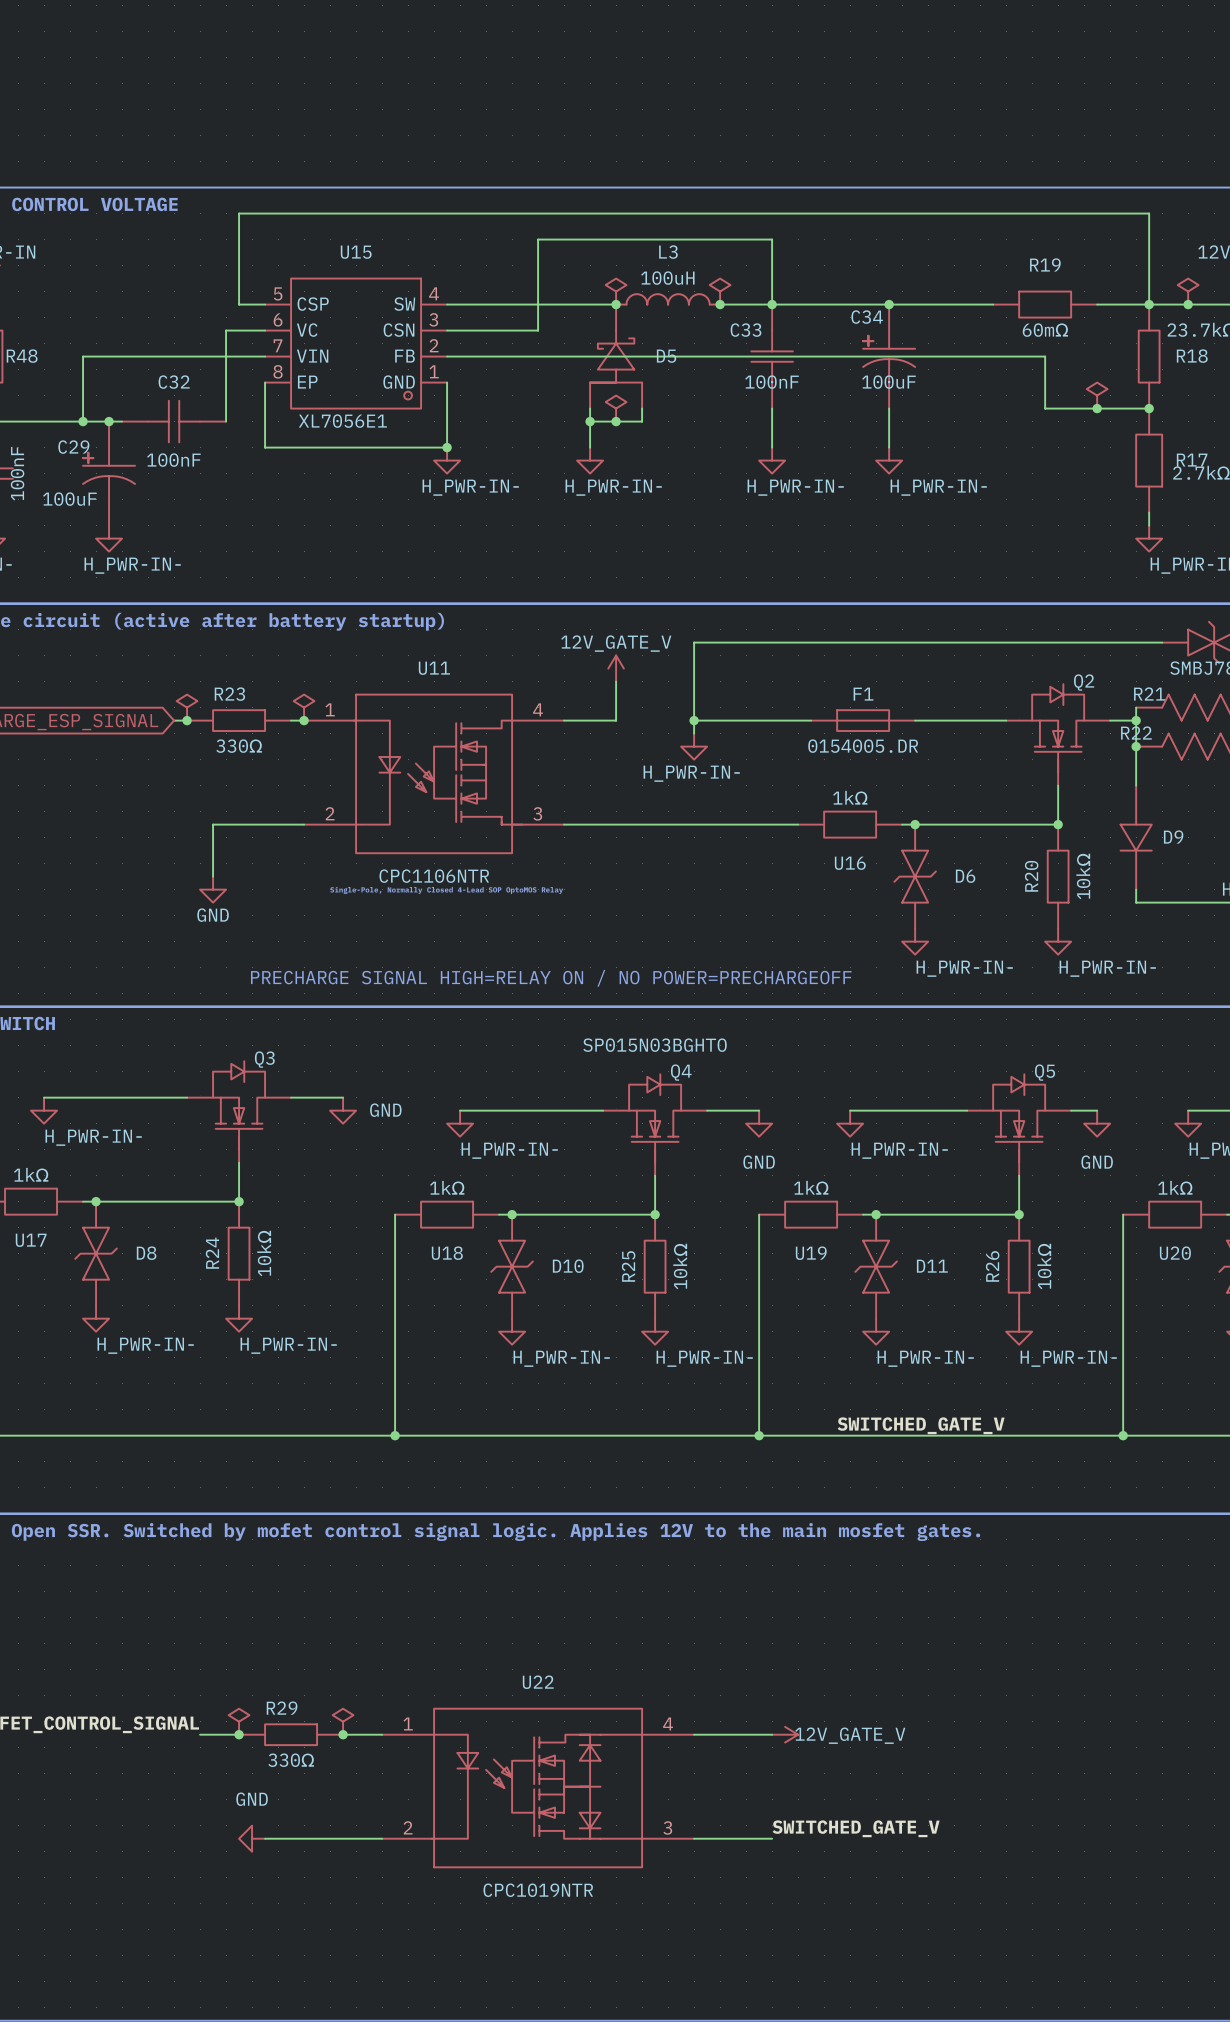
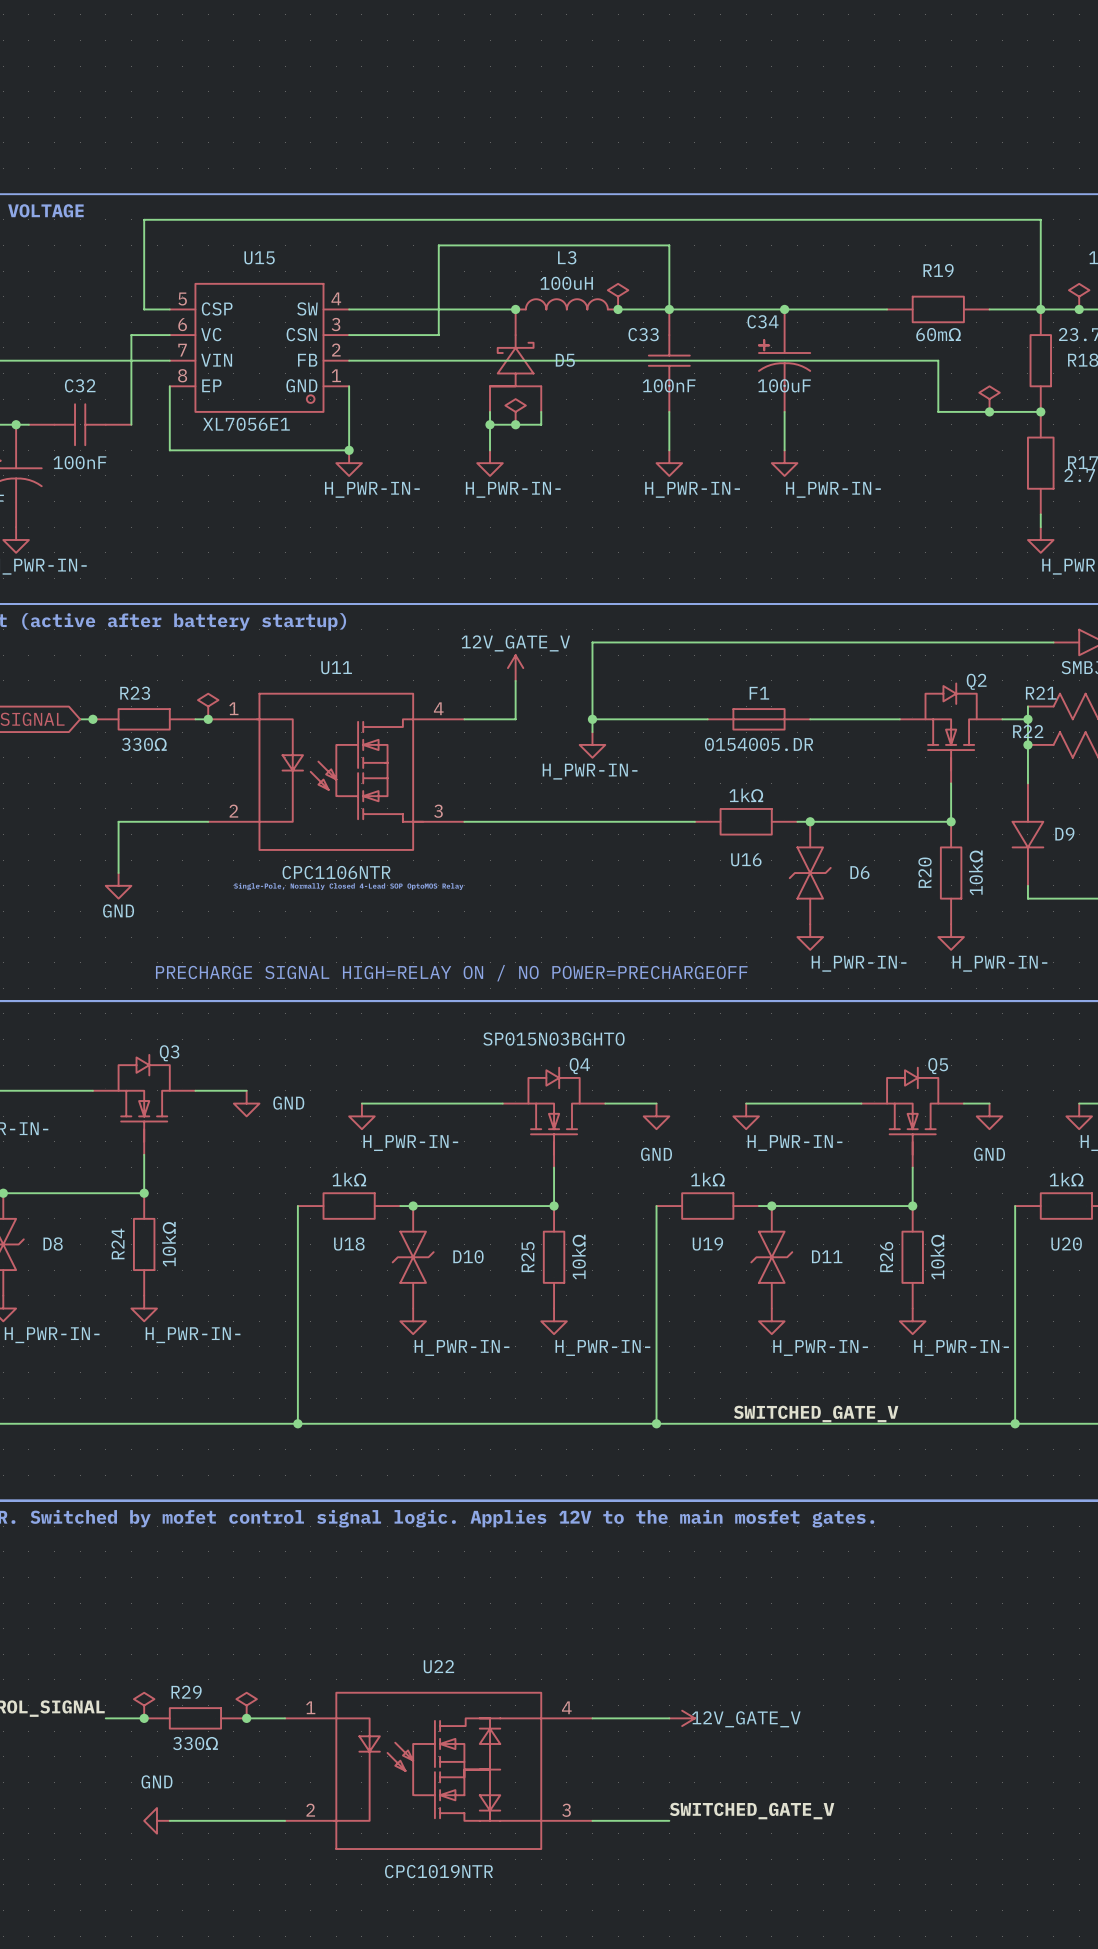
power symbol: (616, 291) -> none
power symbol: (187, 707) -> none

